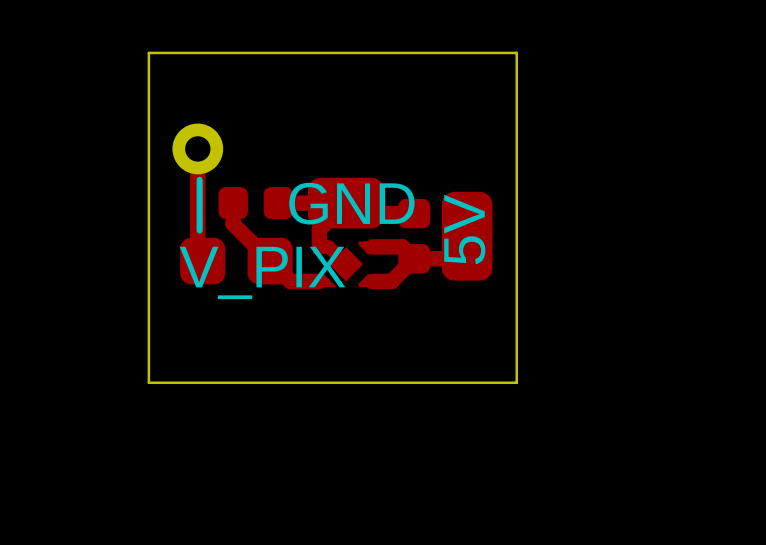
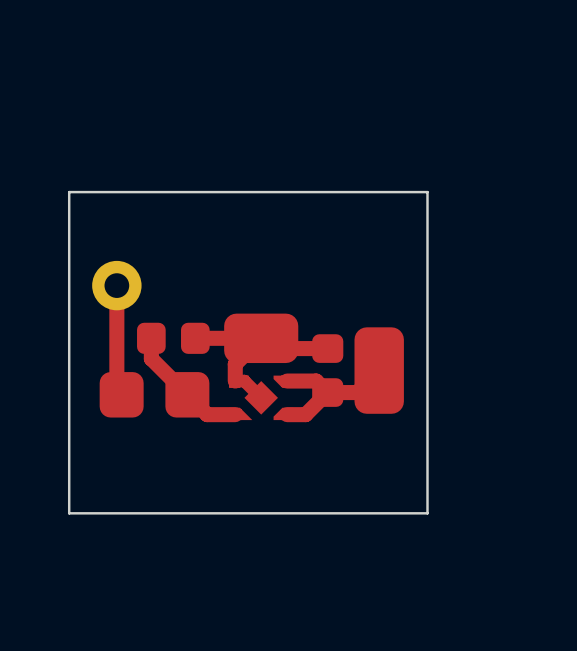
line: (199, 179) (199, 230) -> none
text: GND (351, 203) -> none
text: 5V (464, 229) -> none
text: V_PIX (262, 272) -> none

